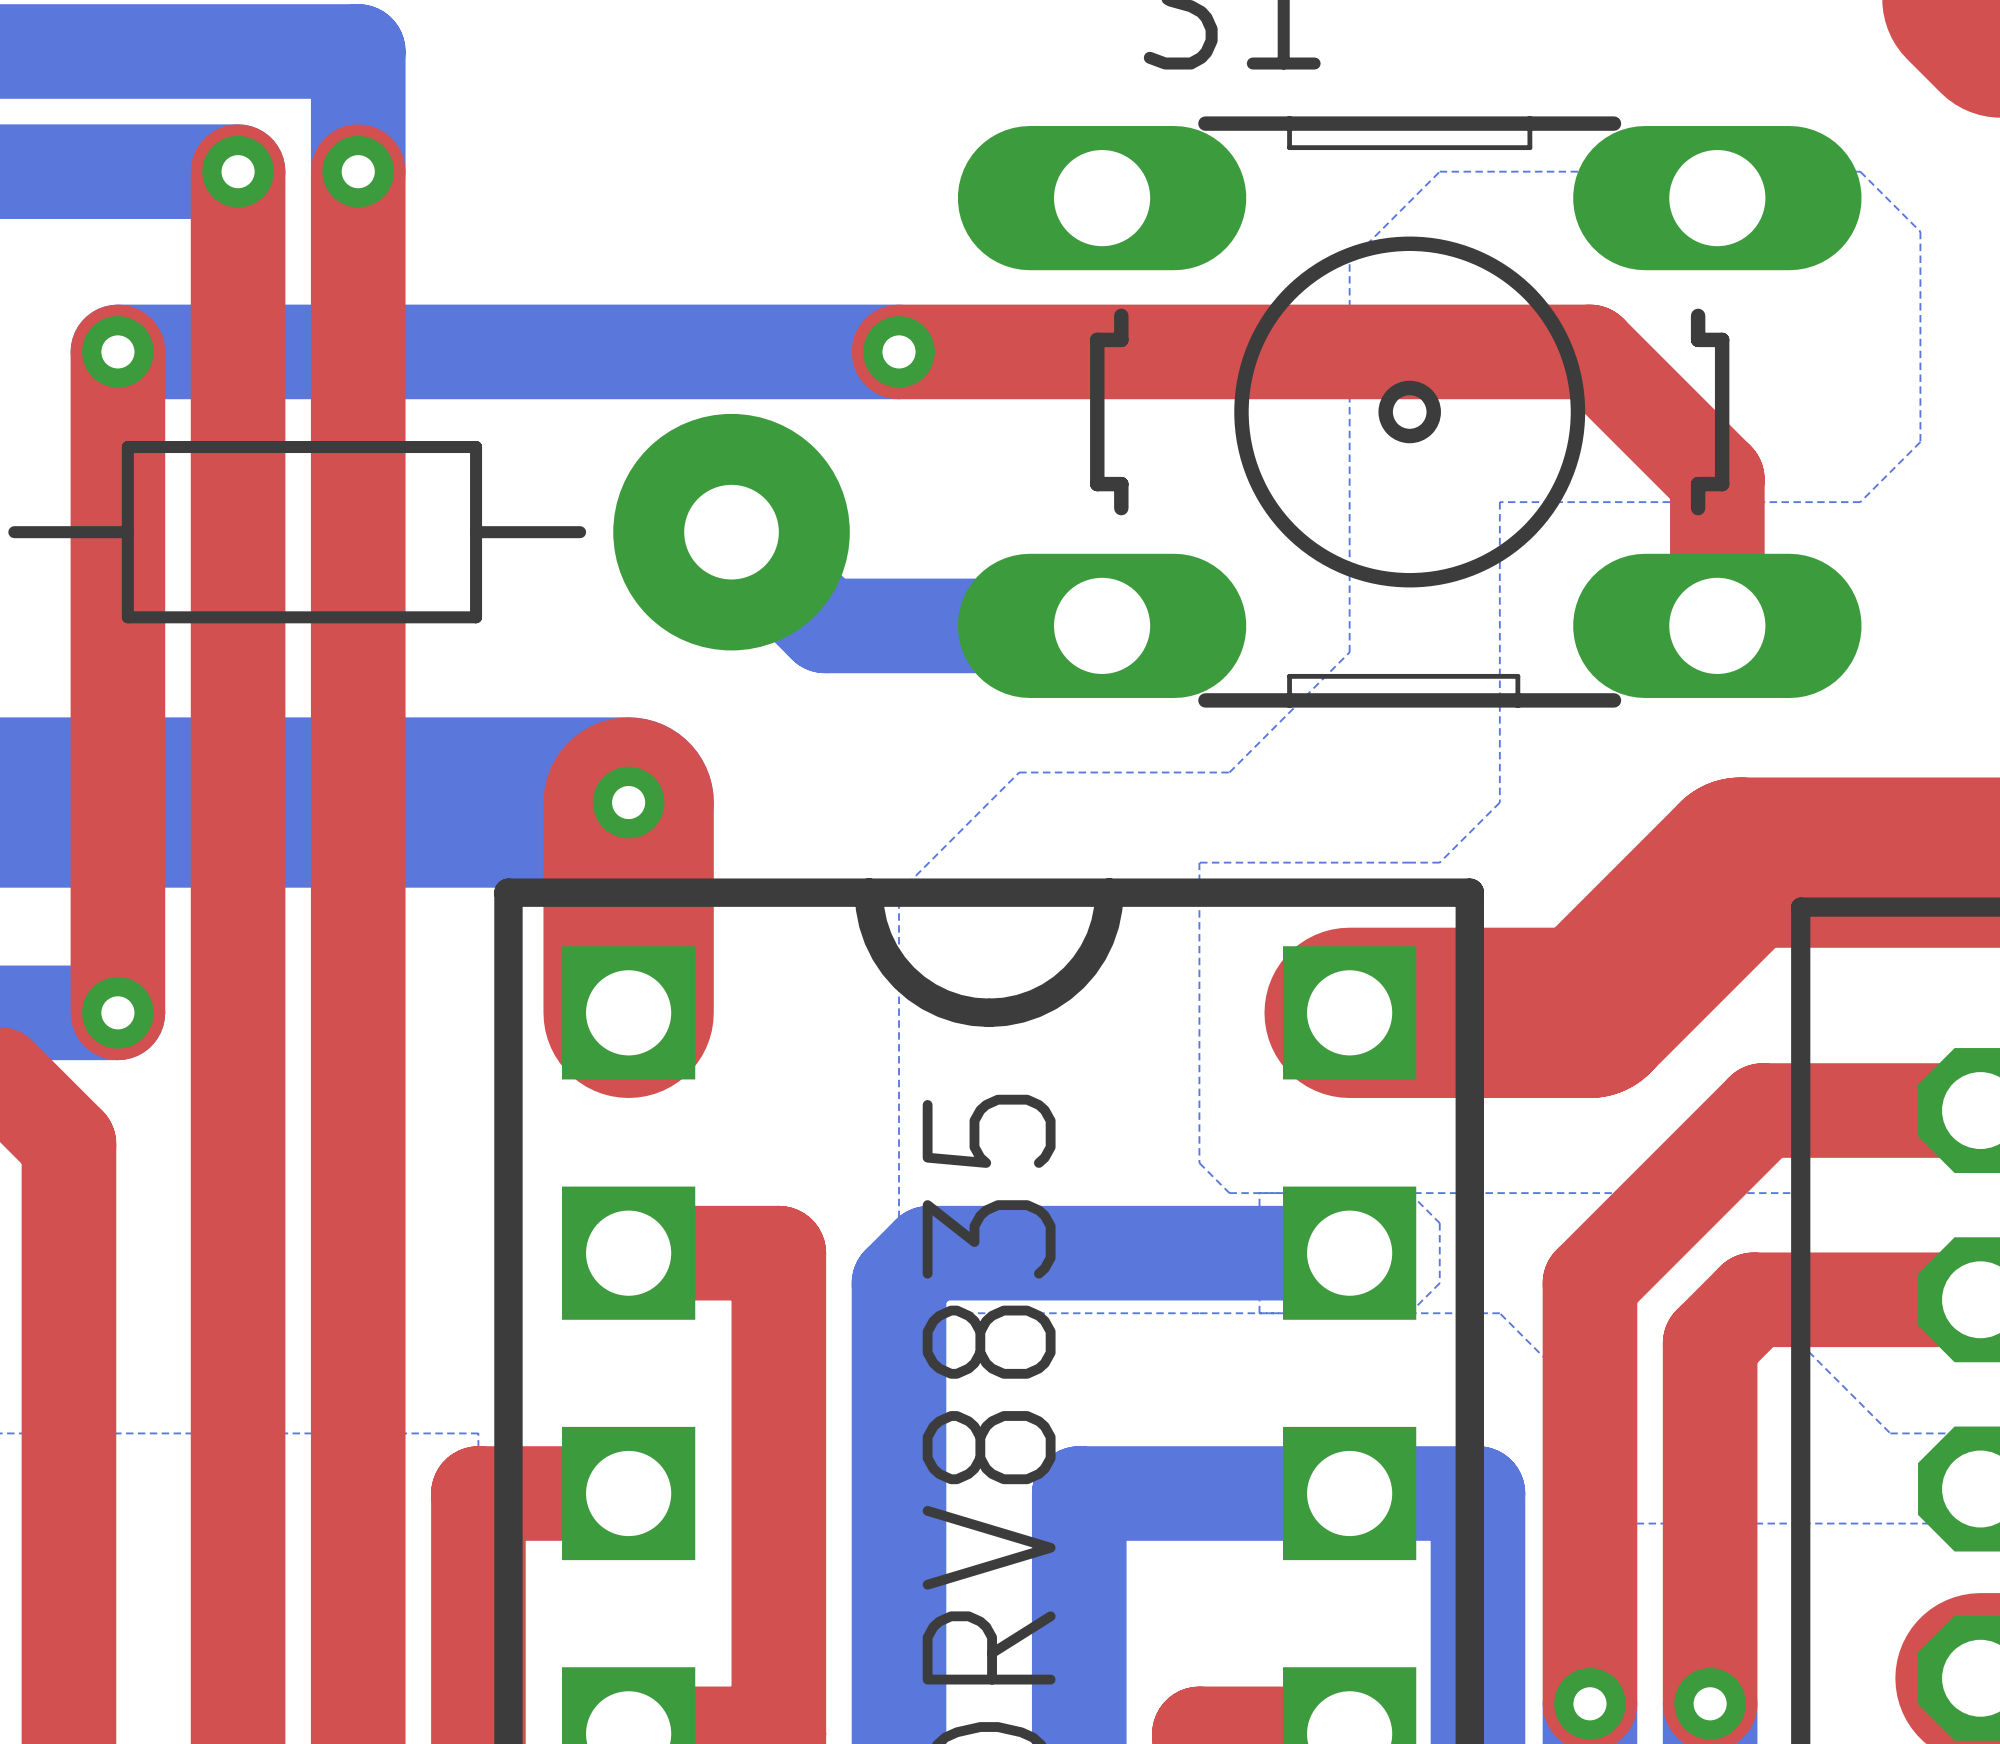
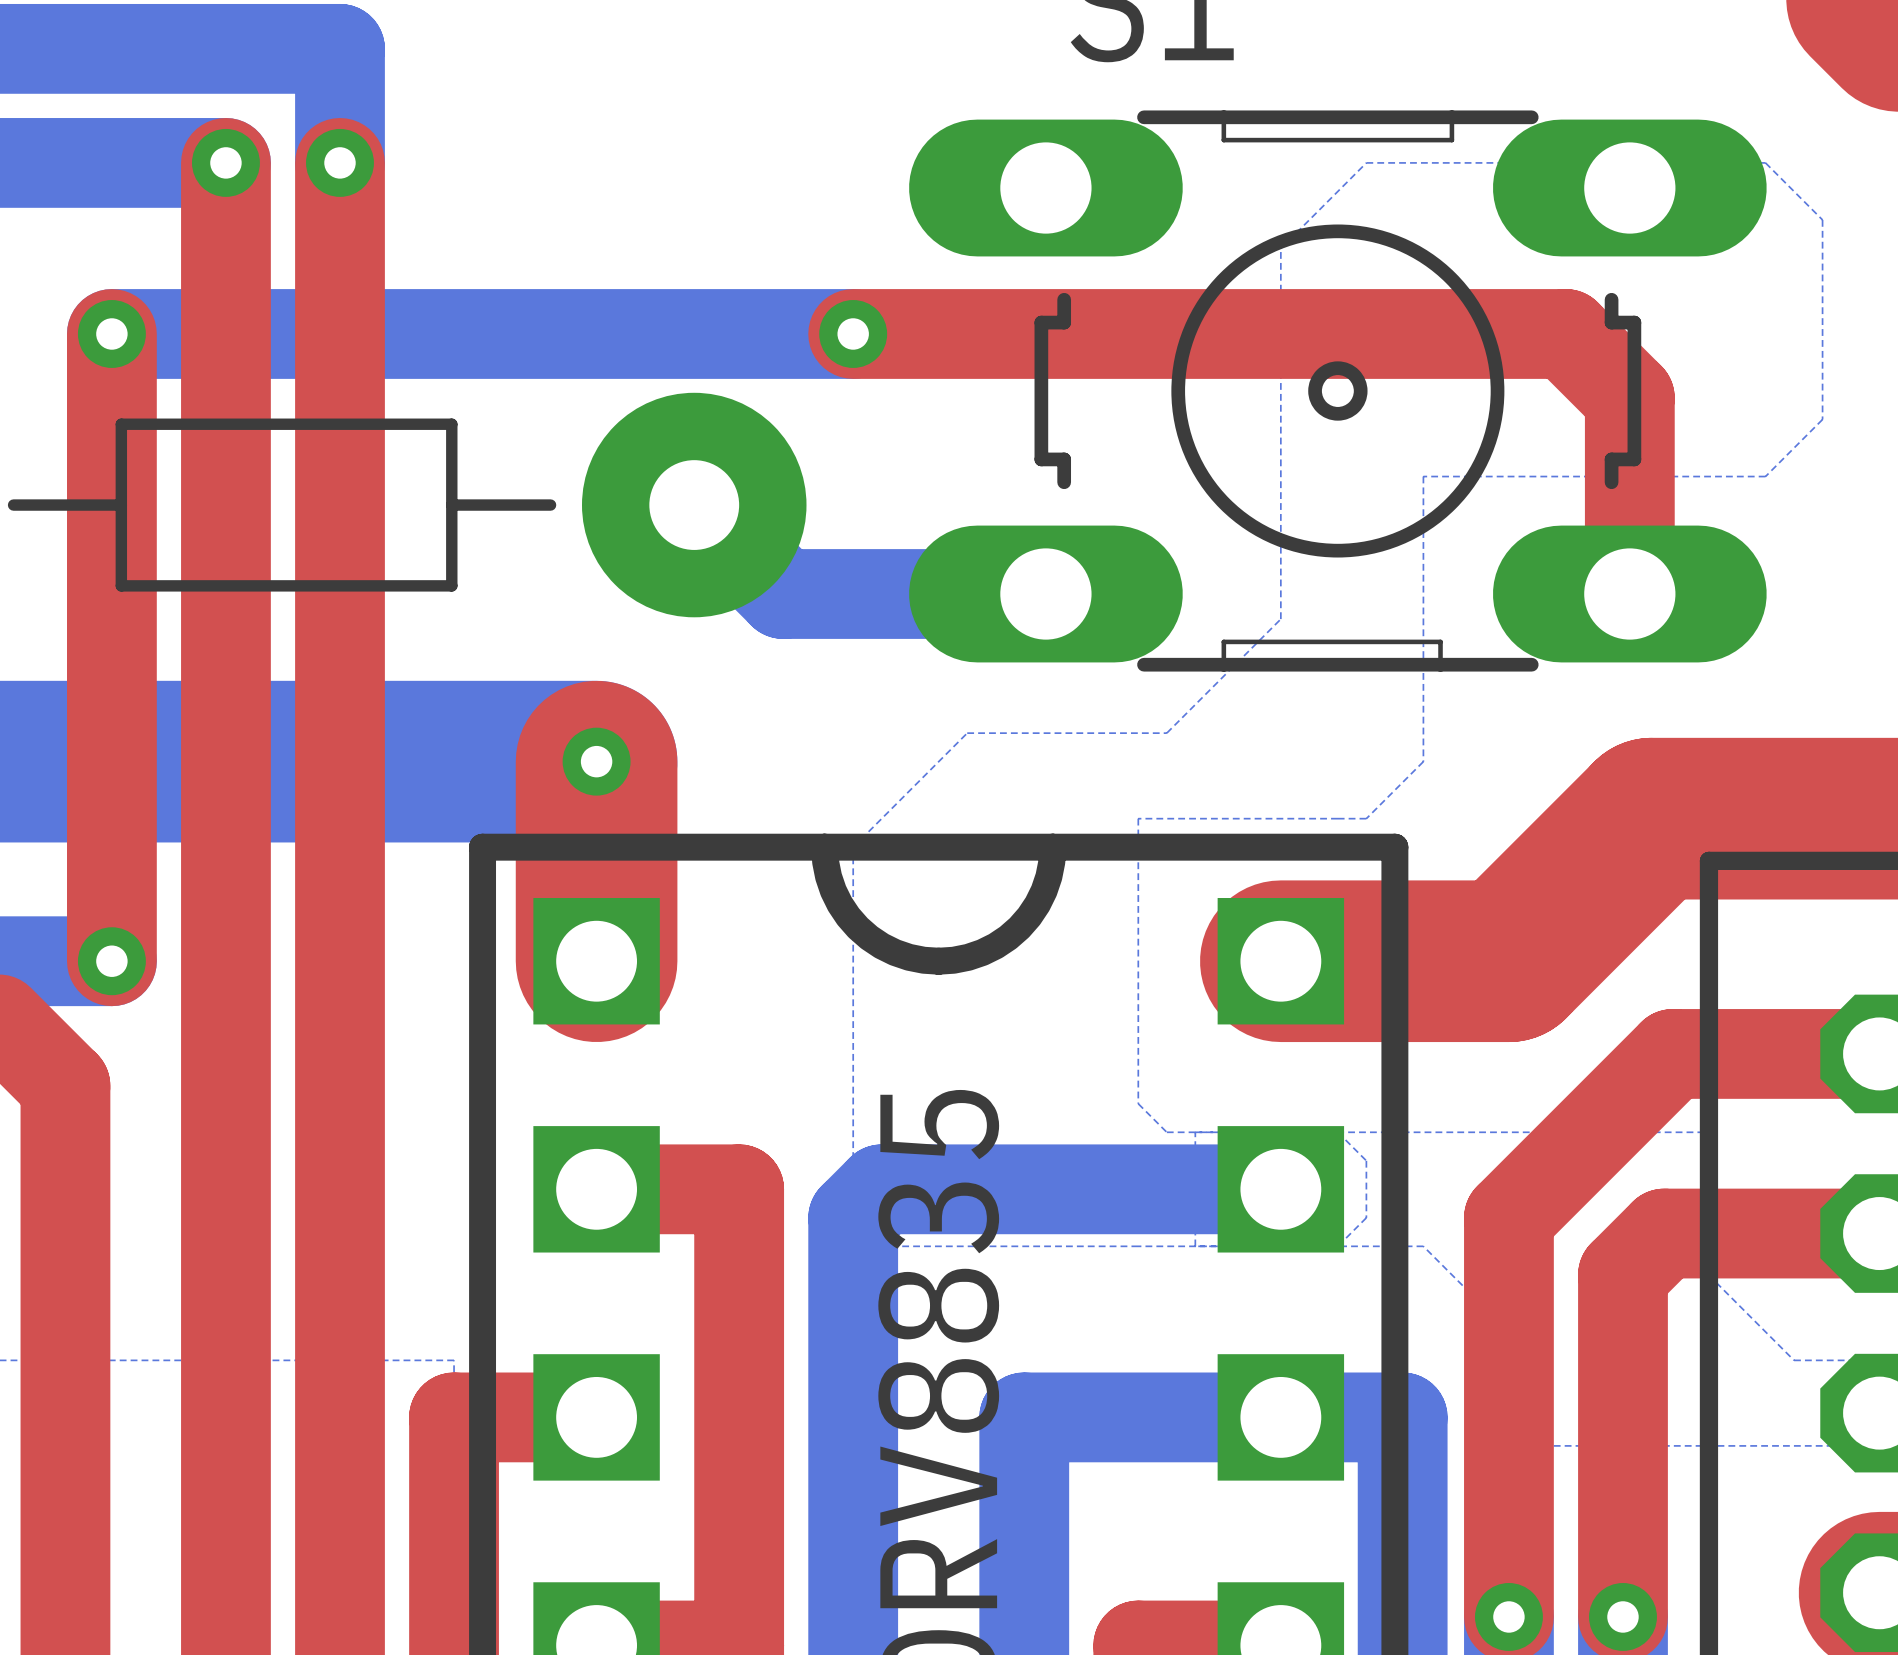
top track: (1589, 351) (1717, 479) -> (1508, 333) (1565, 333) (1629, 397) (1629, 454)

